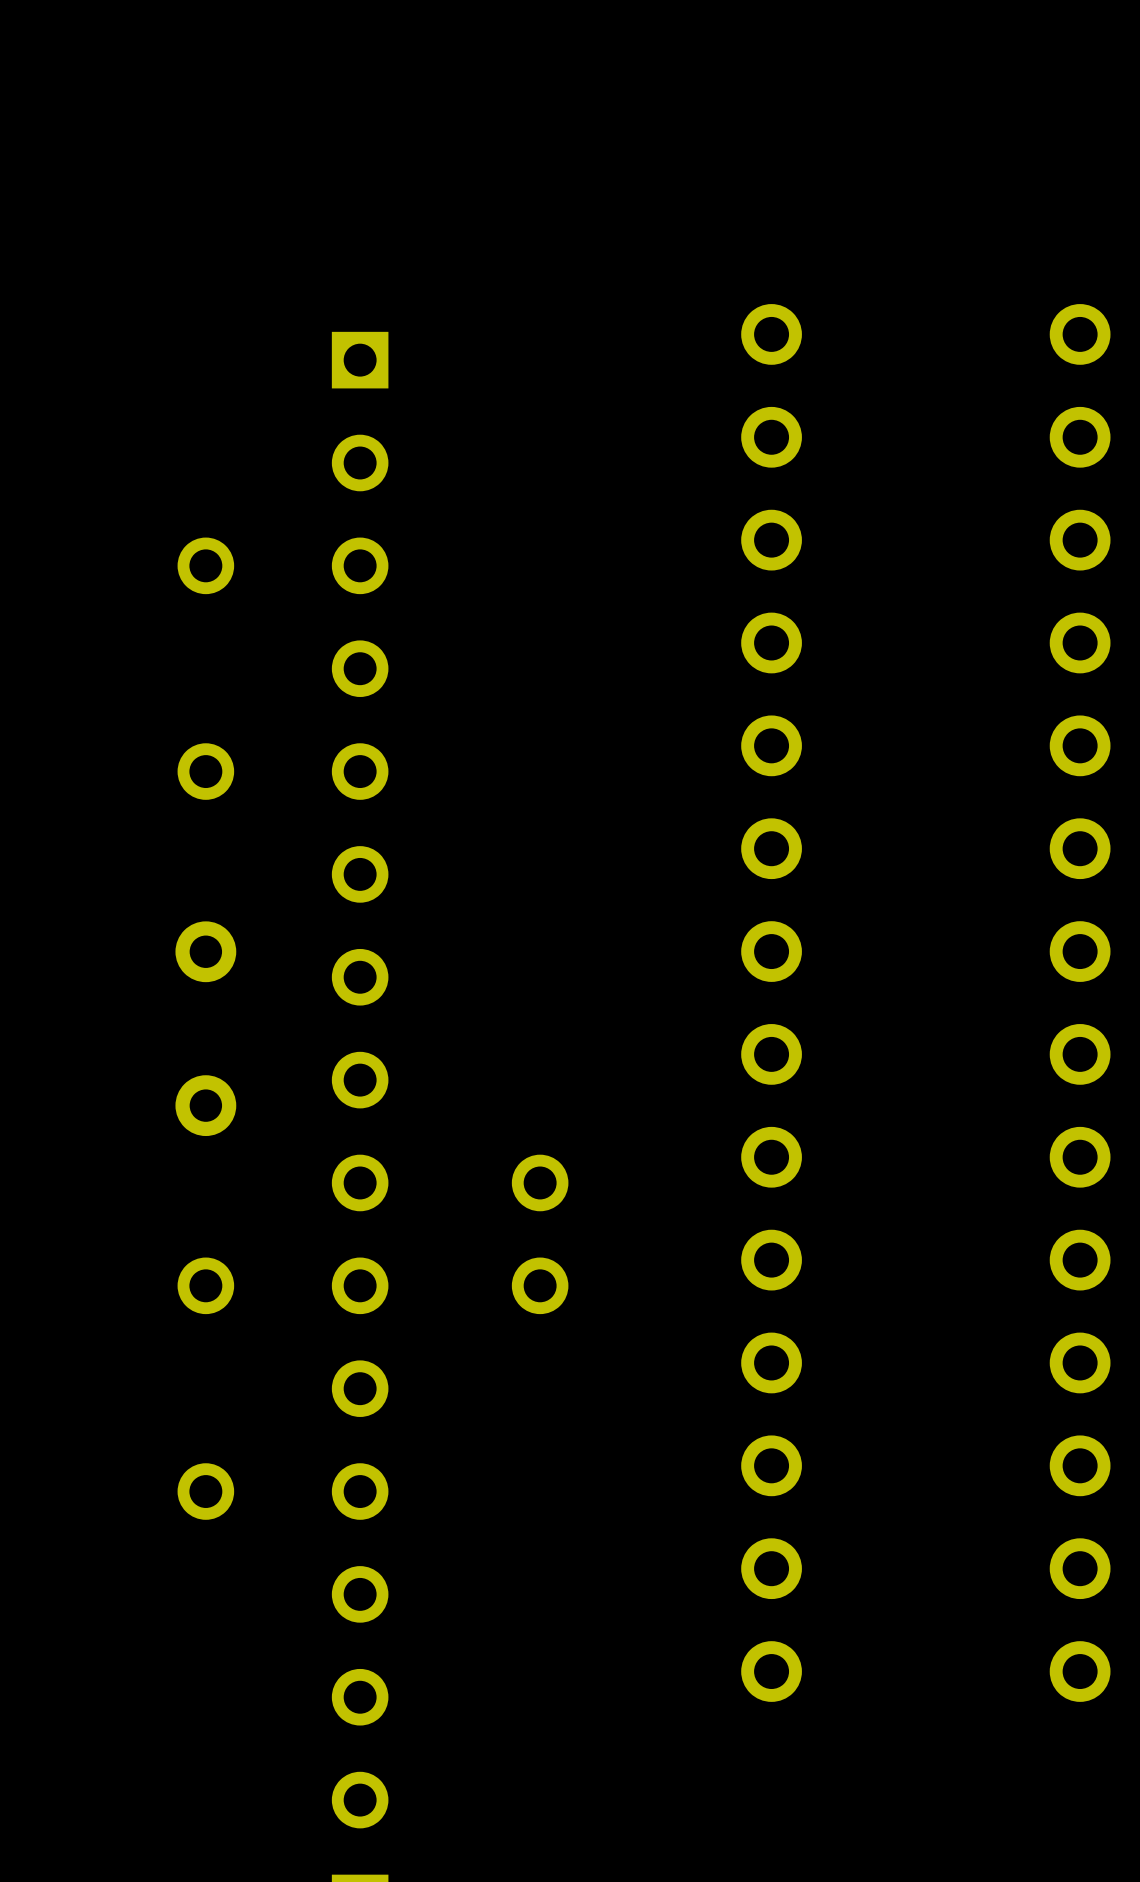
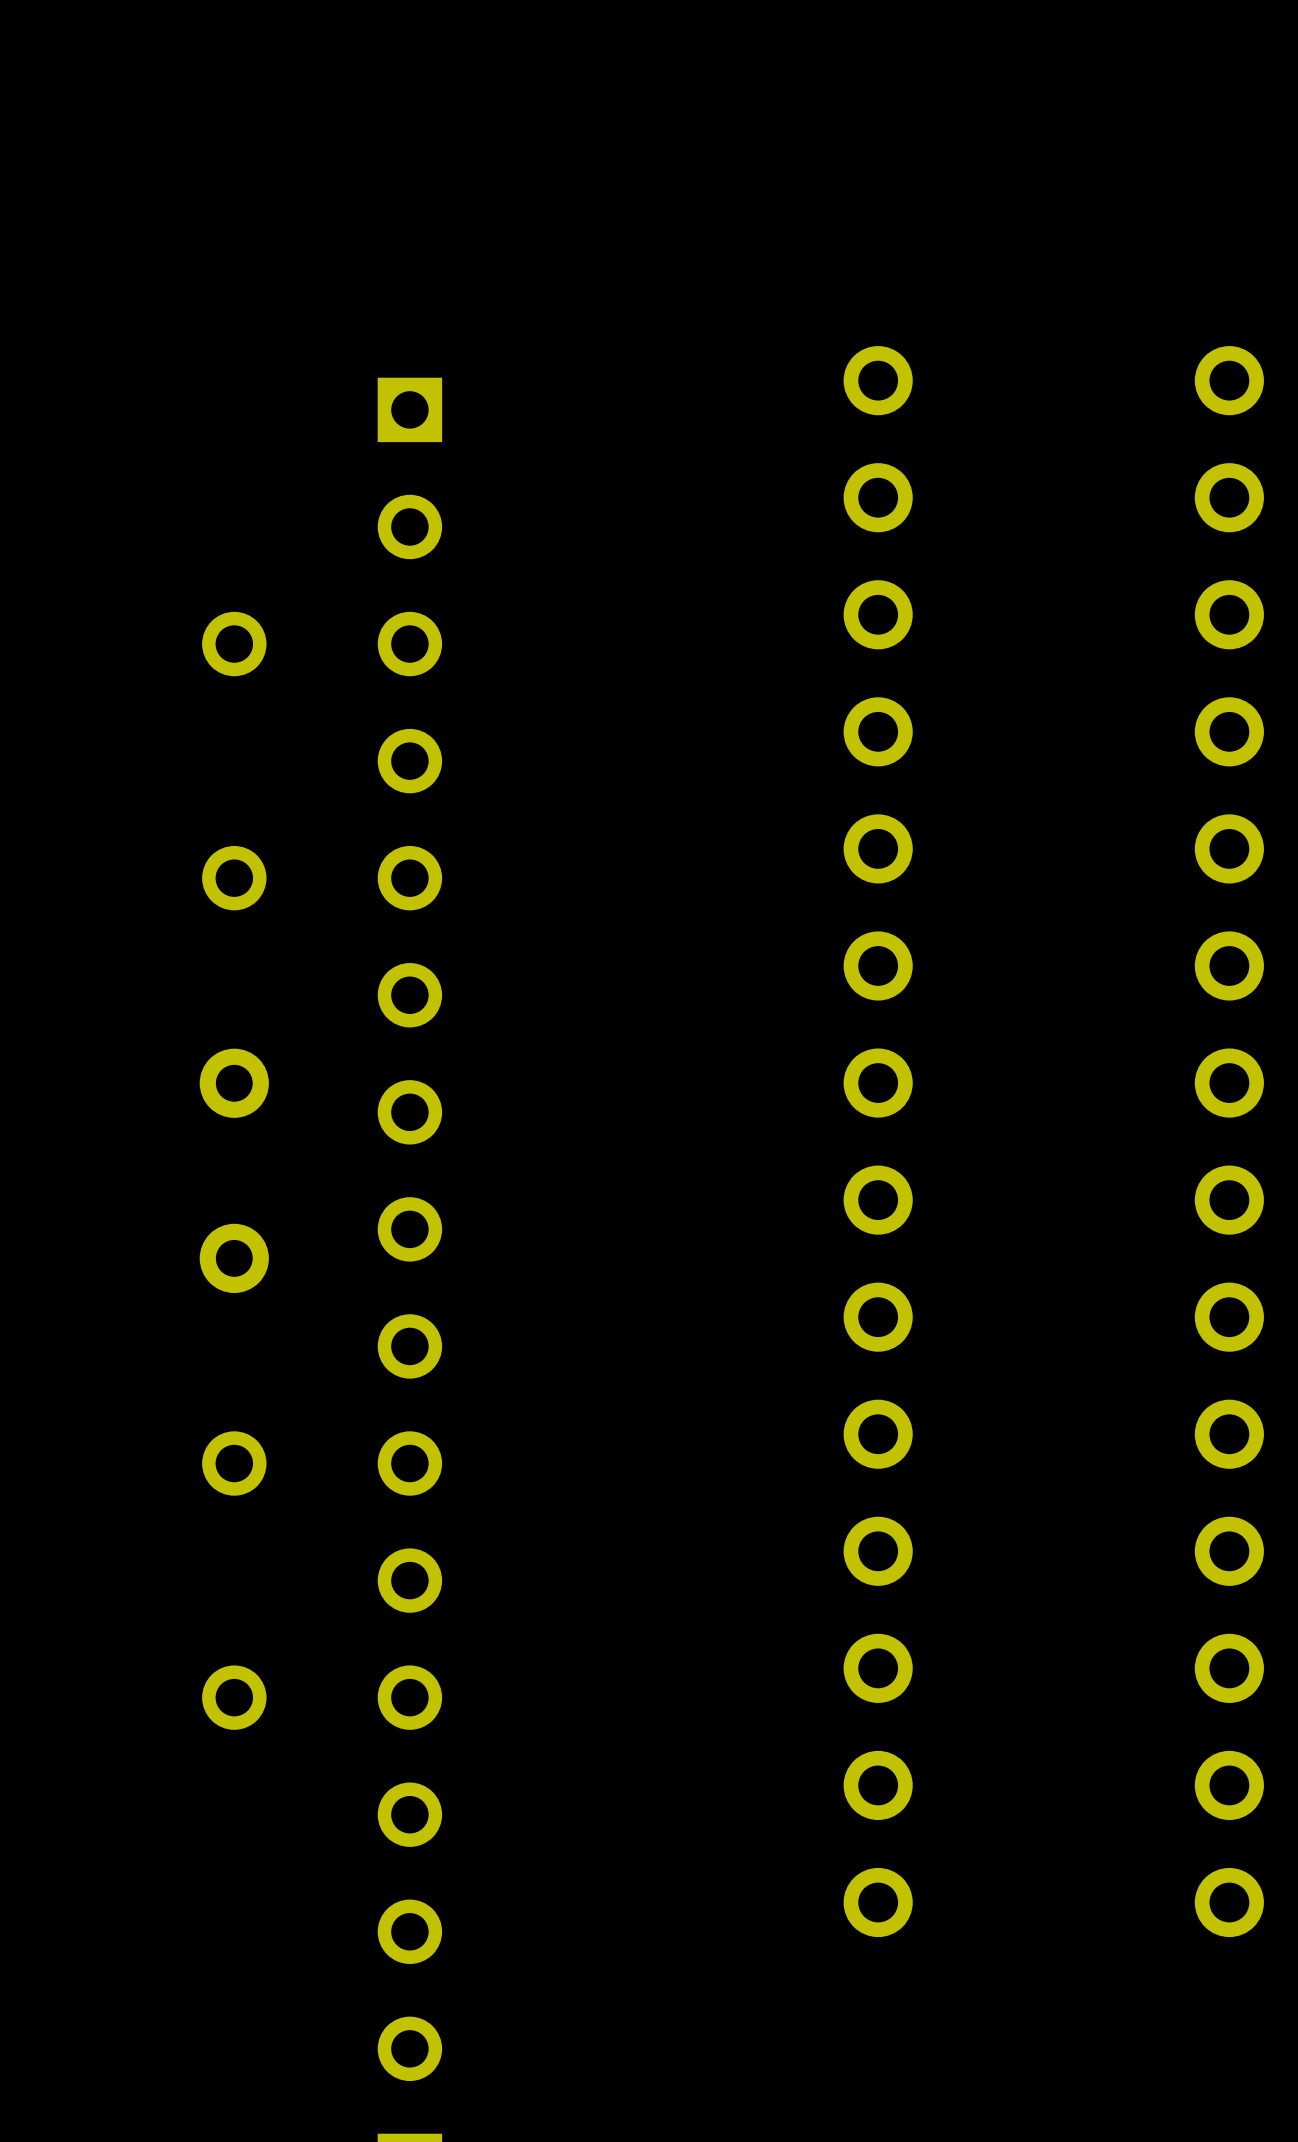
part: (540, 1234) -> none

